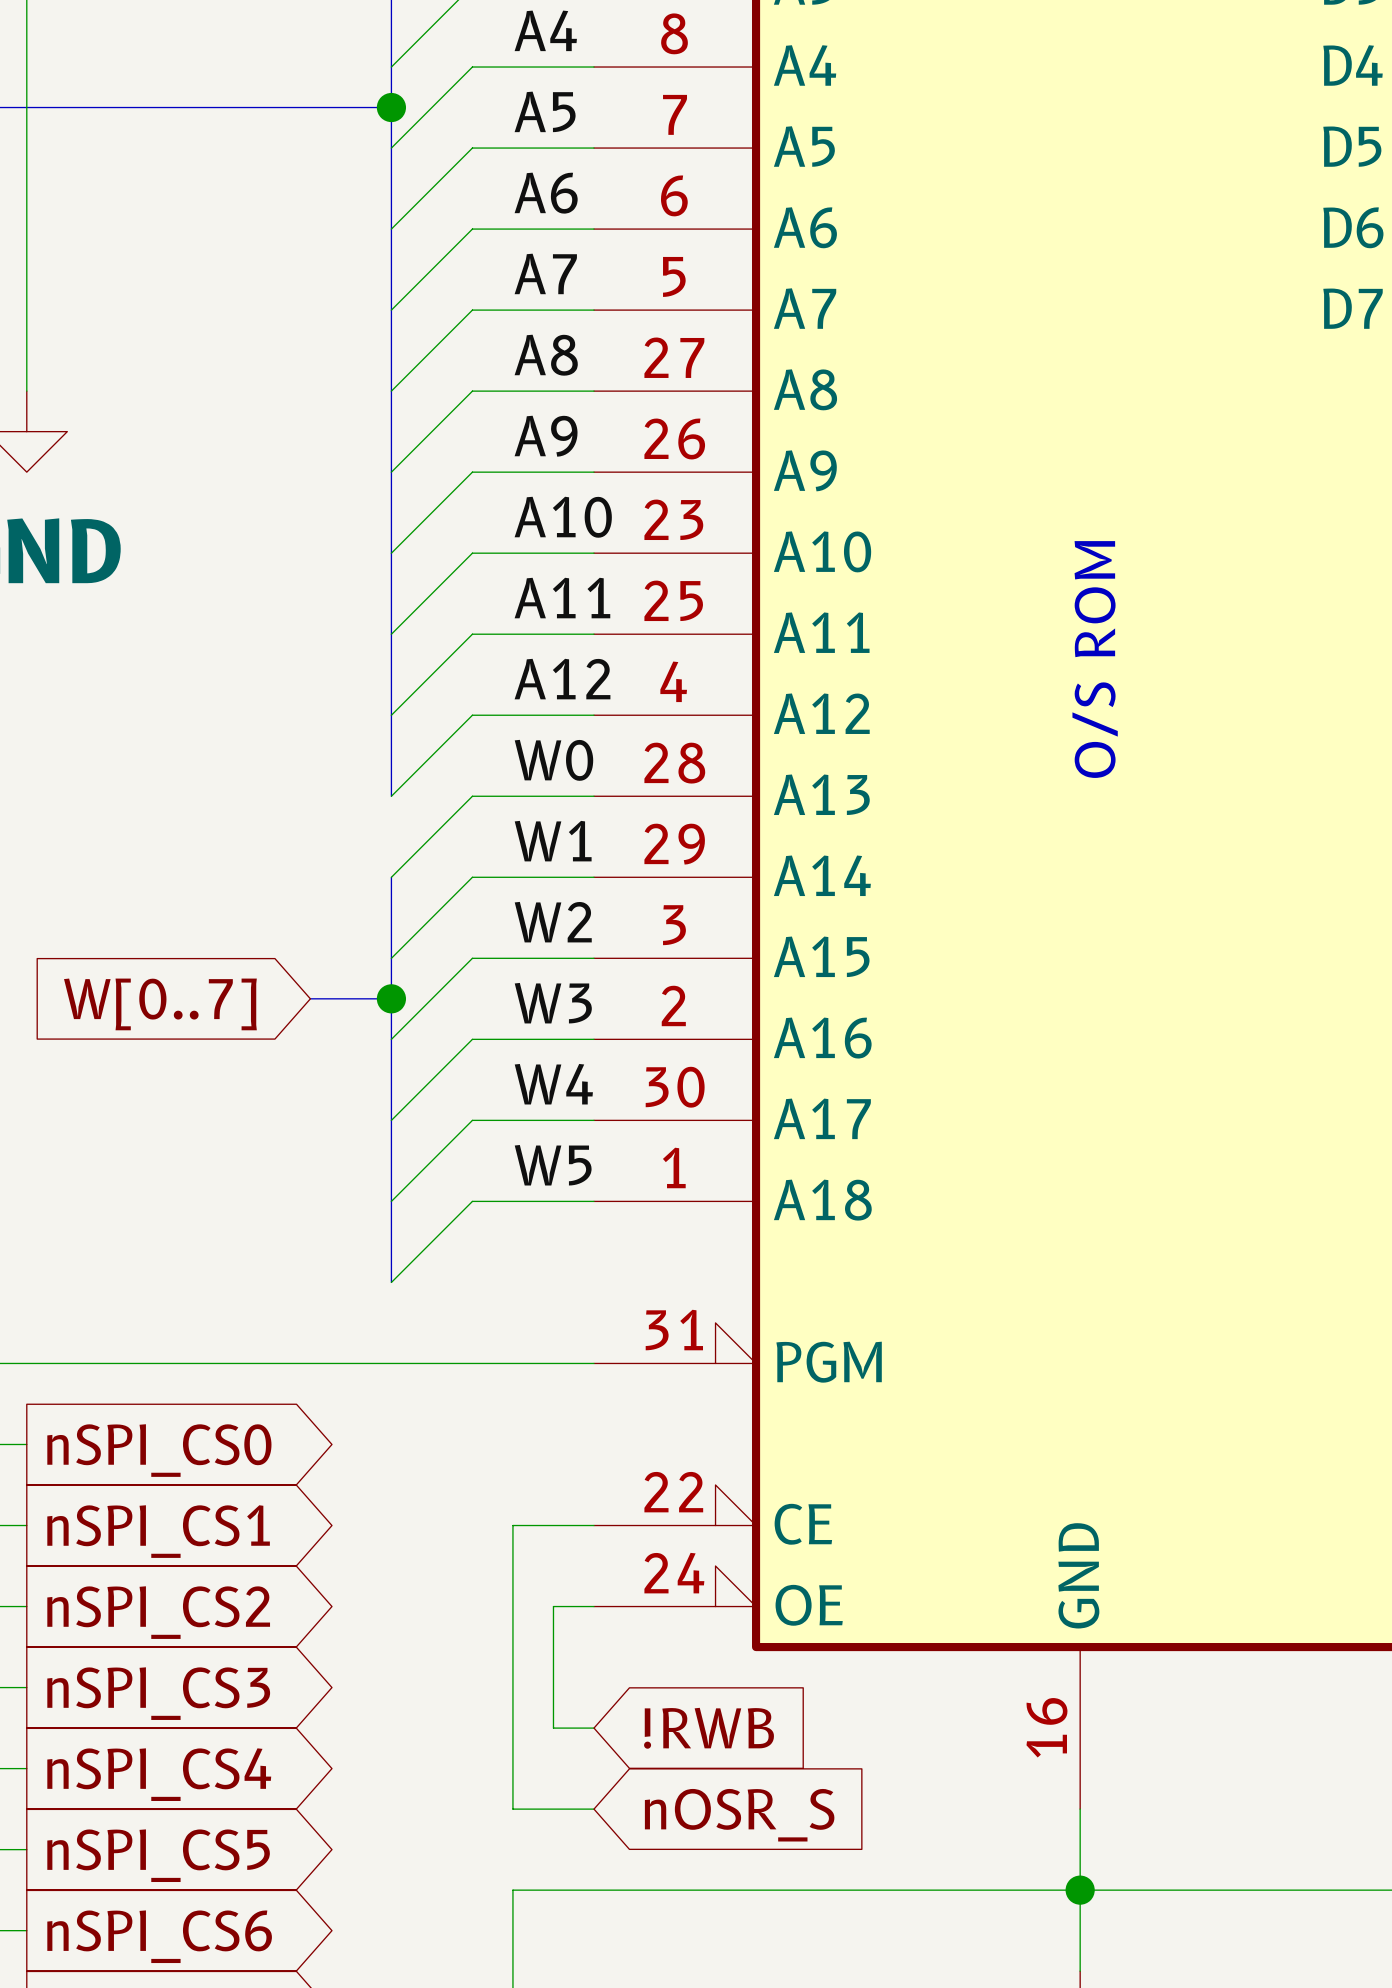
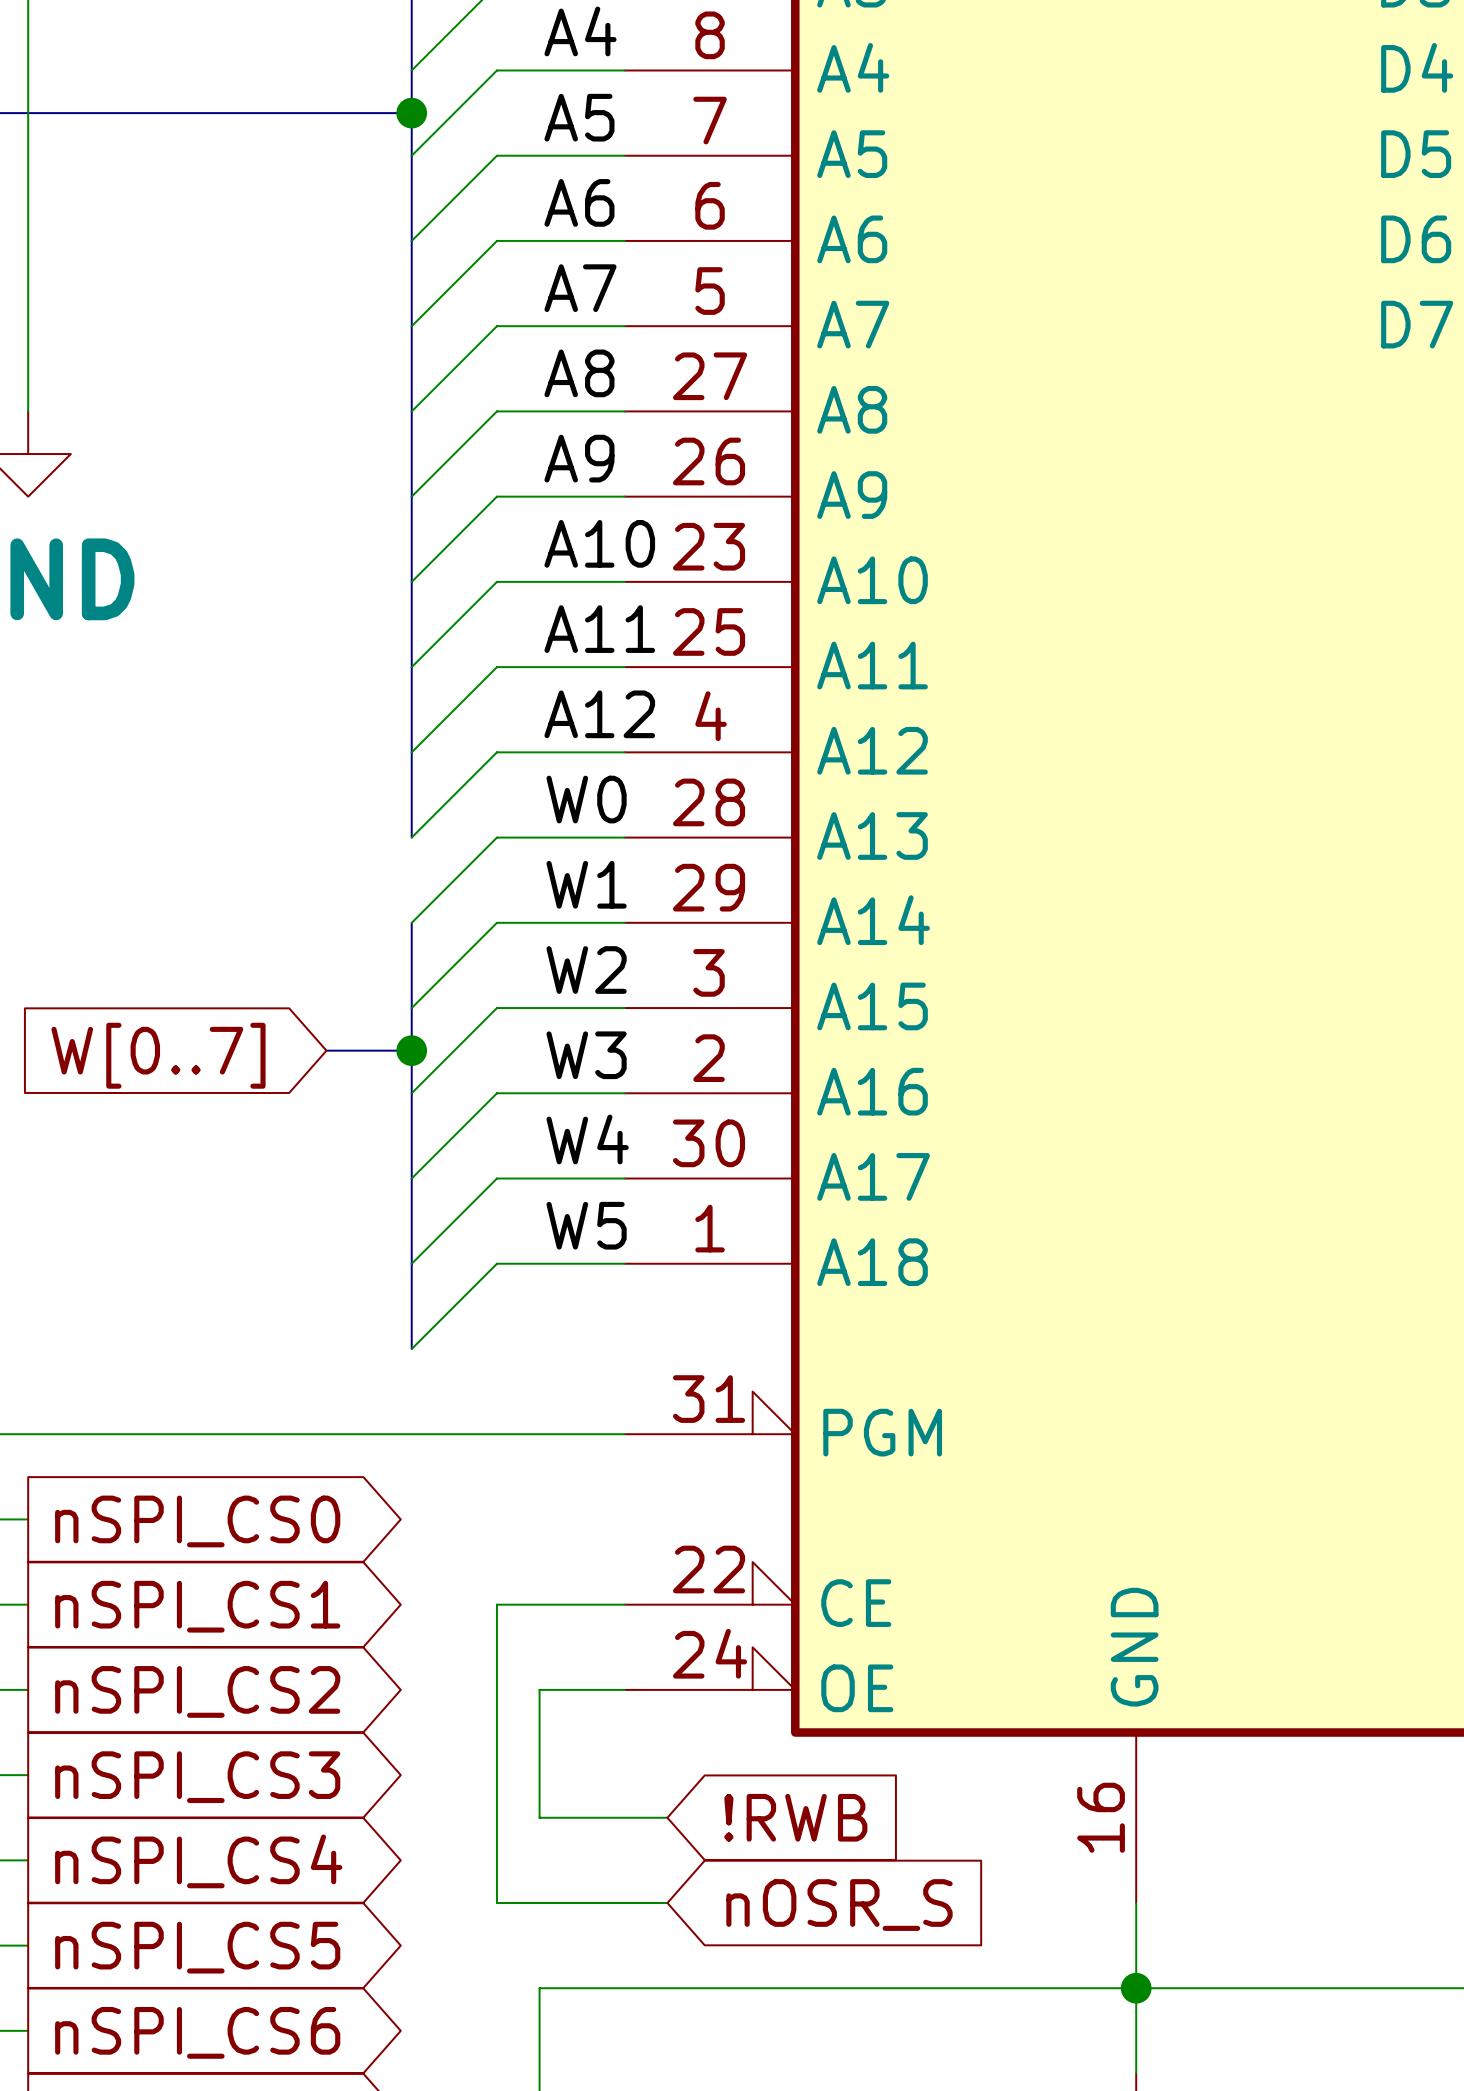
text: O/S ROM (1095, 659) -> none
wire: (512, 1525) (512, 1606) -> (582, 1689) (539, 1689)
wire: none -> (539, 1604) (496, 1604) (496, 1902) (539, 1902)
wire: (553, 1606) (553, 1728) -> none
wire: (512, 1728) (512, 1809) -> (539, 1817) (582, 1817)
wire: none -> (624, 1817) (667, 1817)
global label position: !RWB (709, 1728) -> !RWB (795, 1817)
wire: none -> (624, 1902) (667, 1902)
global label position: nOSR_S (739, 1815) -> nOSR_S (839, 1905)

